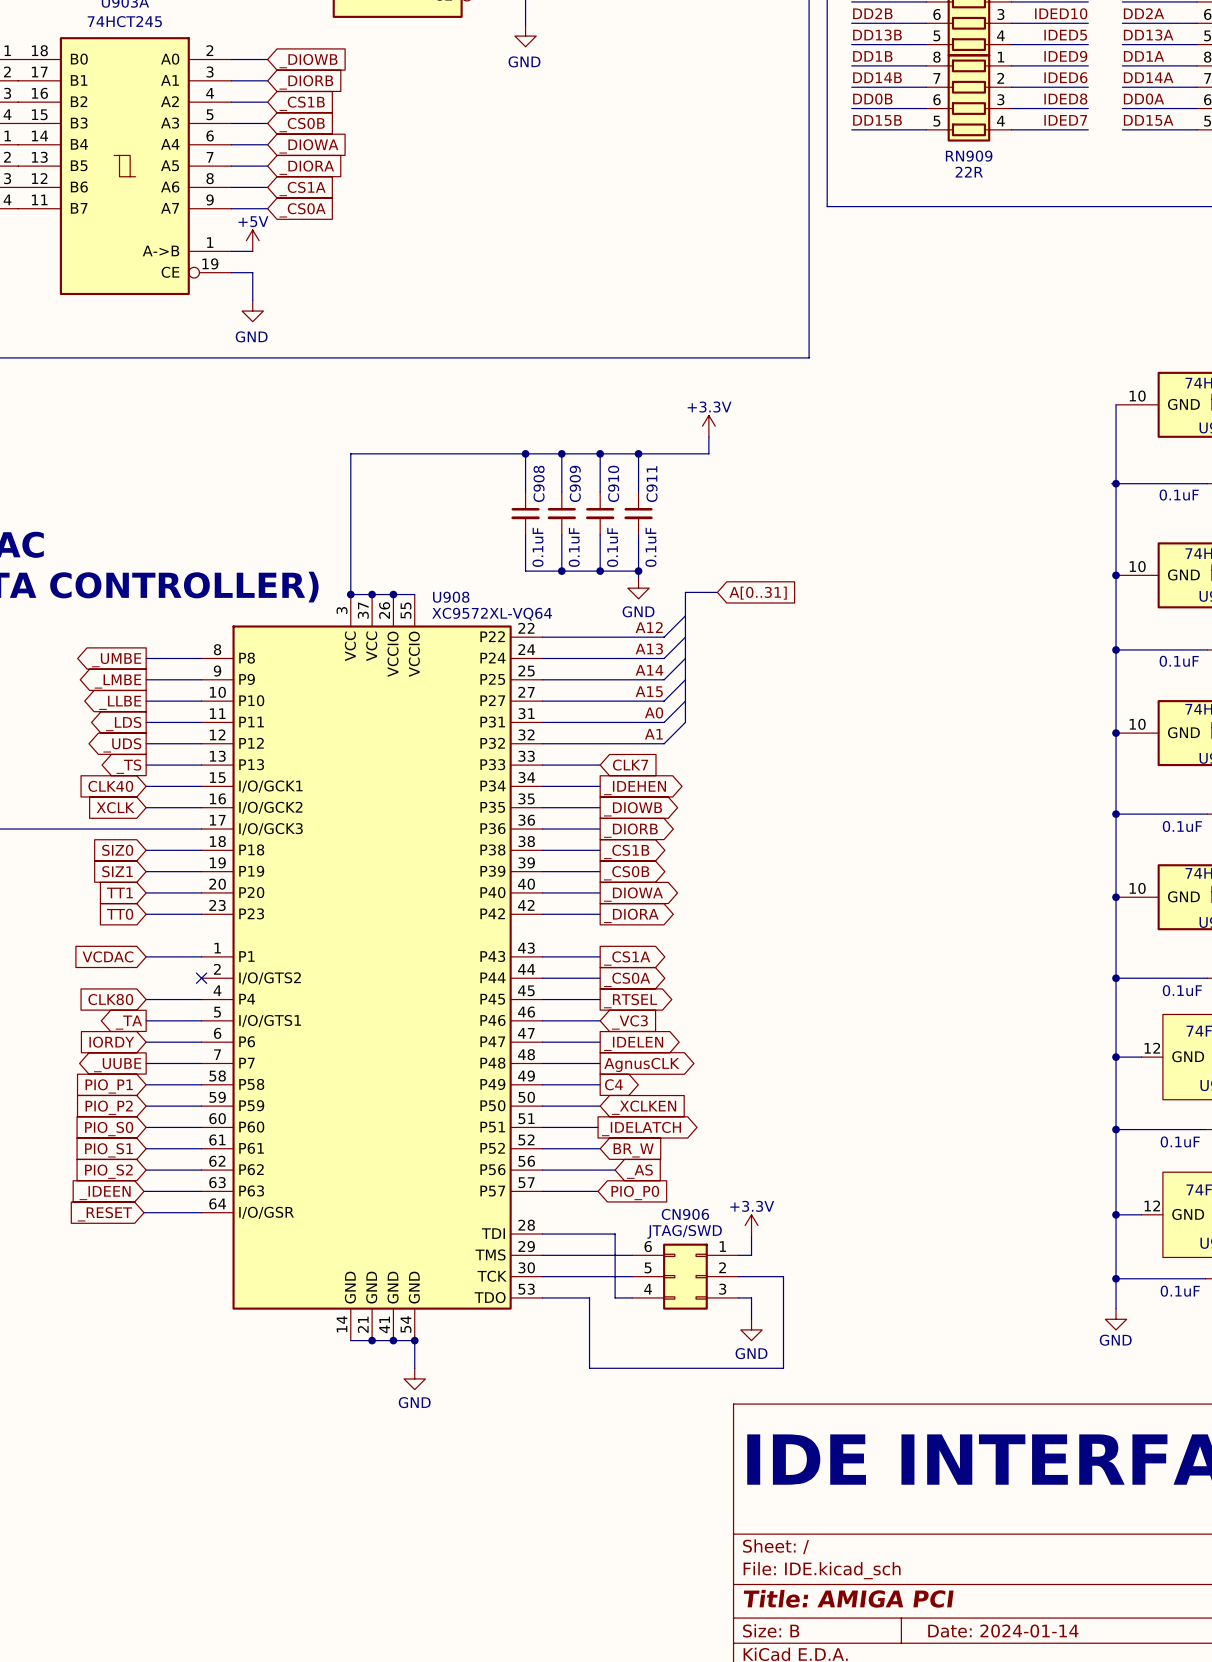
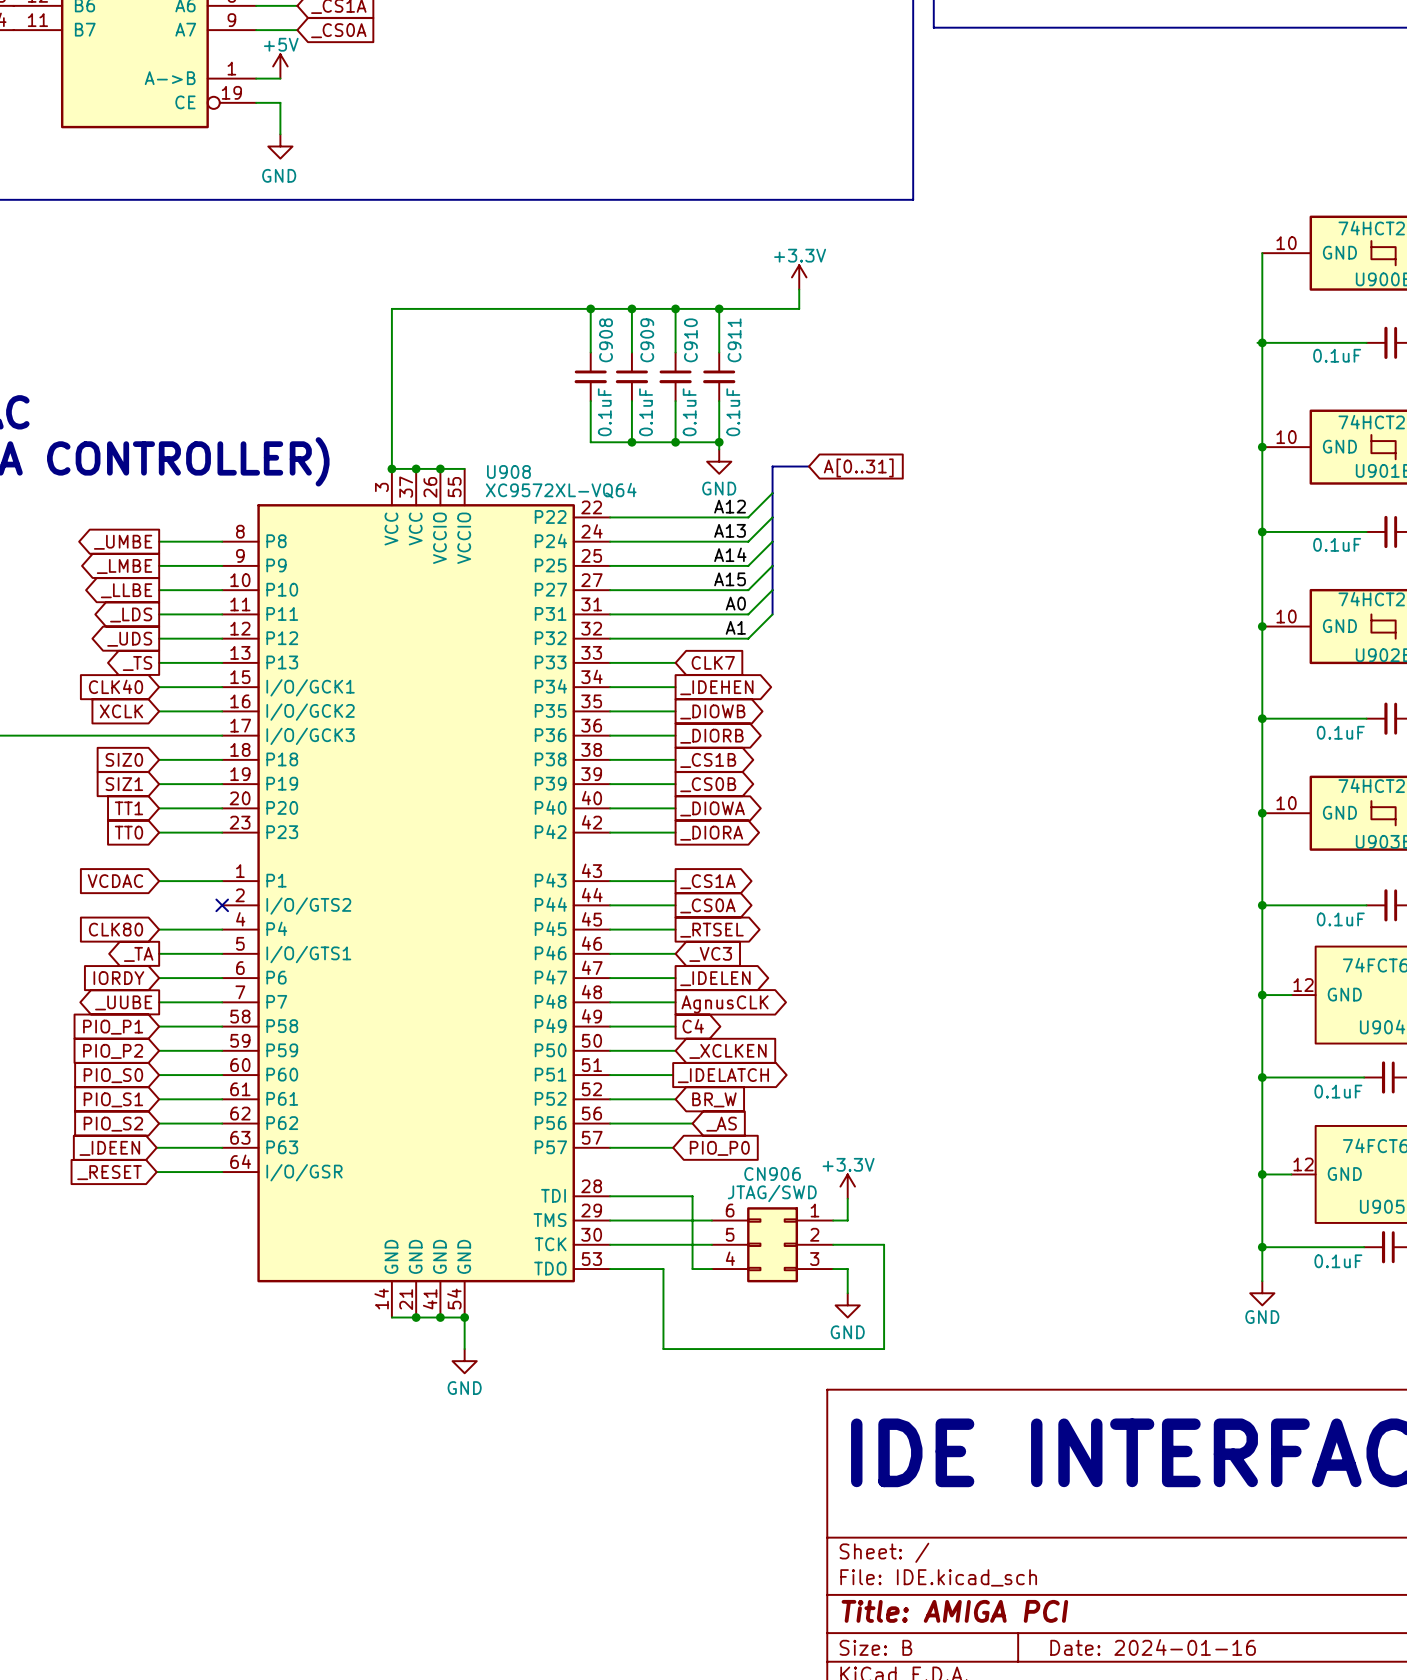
title block: Date: 2024-01-14 (1003, 1631) -> Date: 2024-01-16 (1153, 1647)

